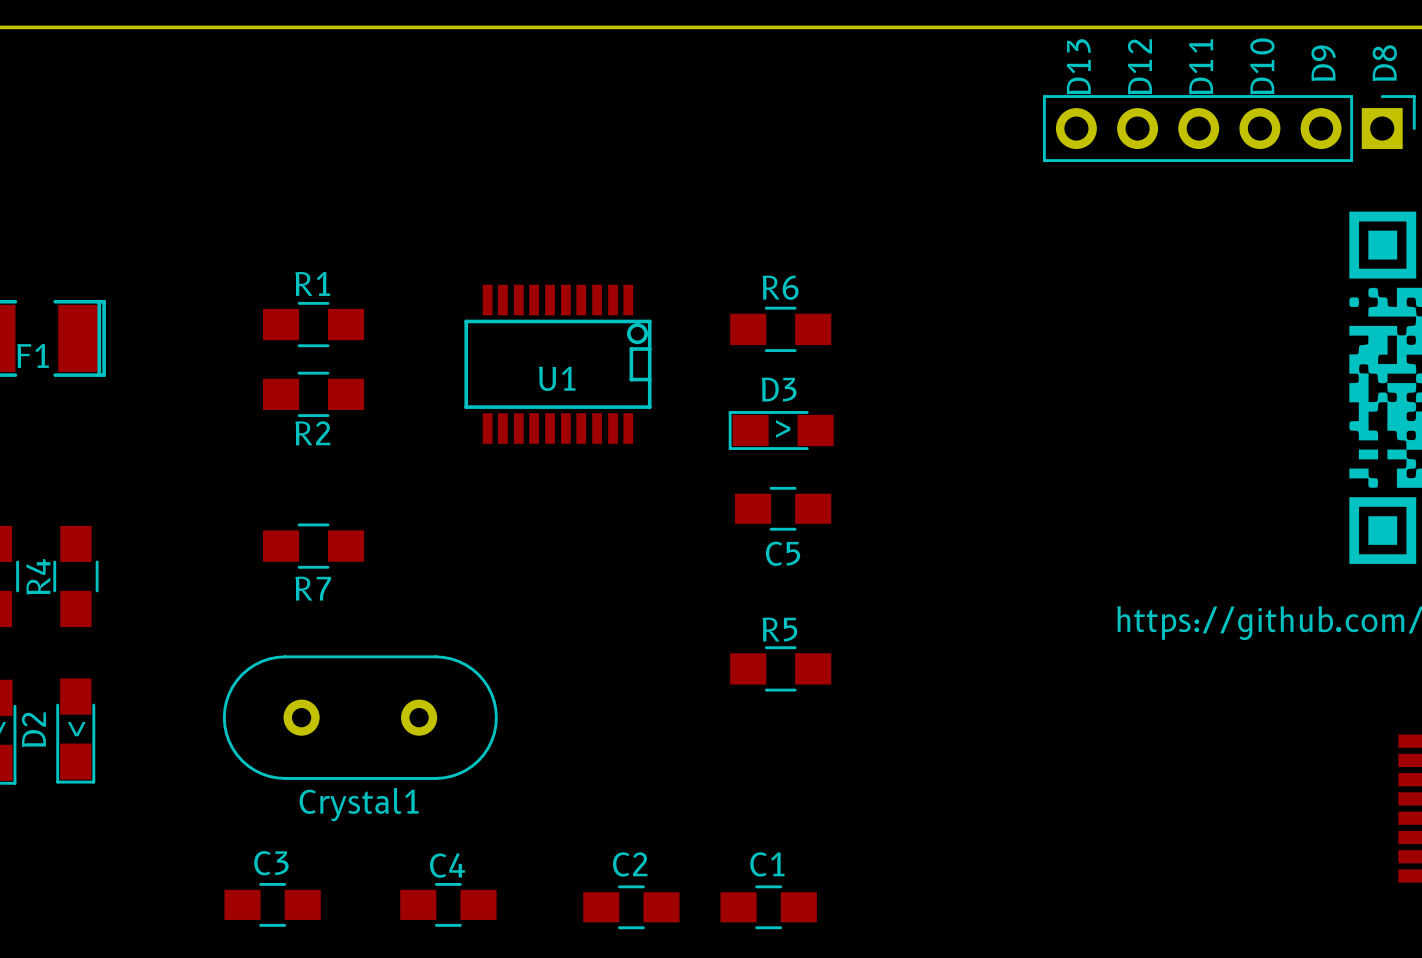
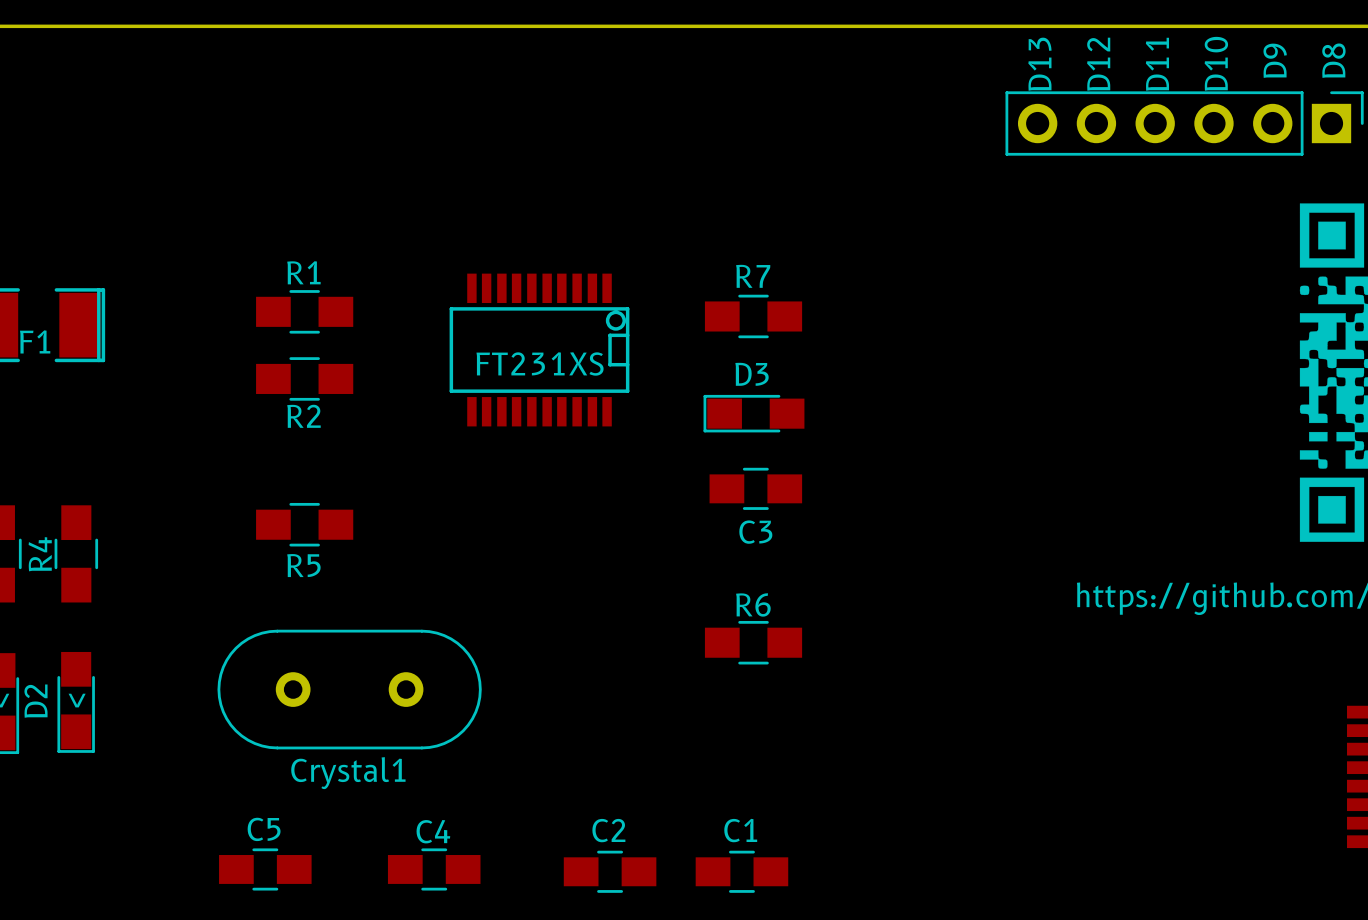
R6 name: R6 (780, 287) -> R7 (753, 276)
U1 name: U1 (557, 378) -> FT231XS (540, 363)
text: > (783, 428) -> none
C5 name: C5 (783, 553) -> C3 (755, 532)
R7 name: R7 (313, 588) -> R5 (303, 565)
R5 name: R5 (779, 629) -> R6 (753, 604)
C3 name: C3 (271, 863) -> C5 (264, 829)

